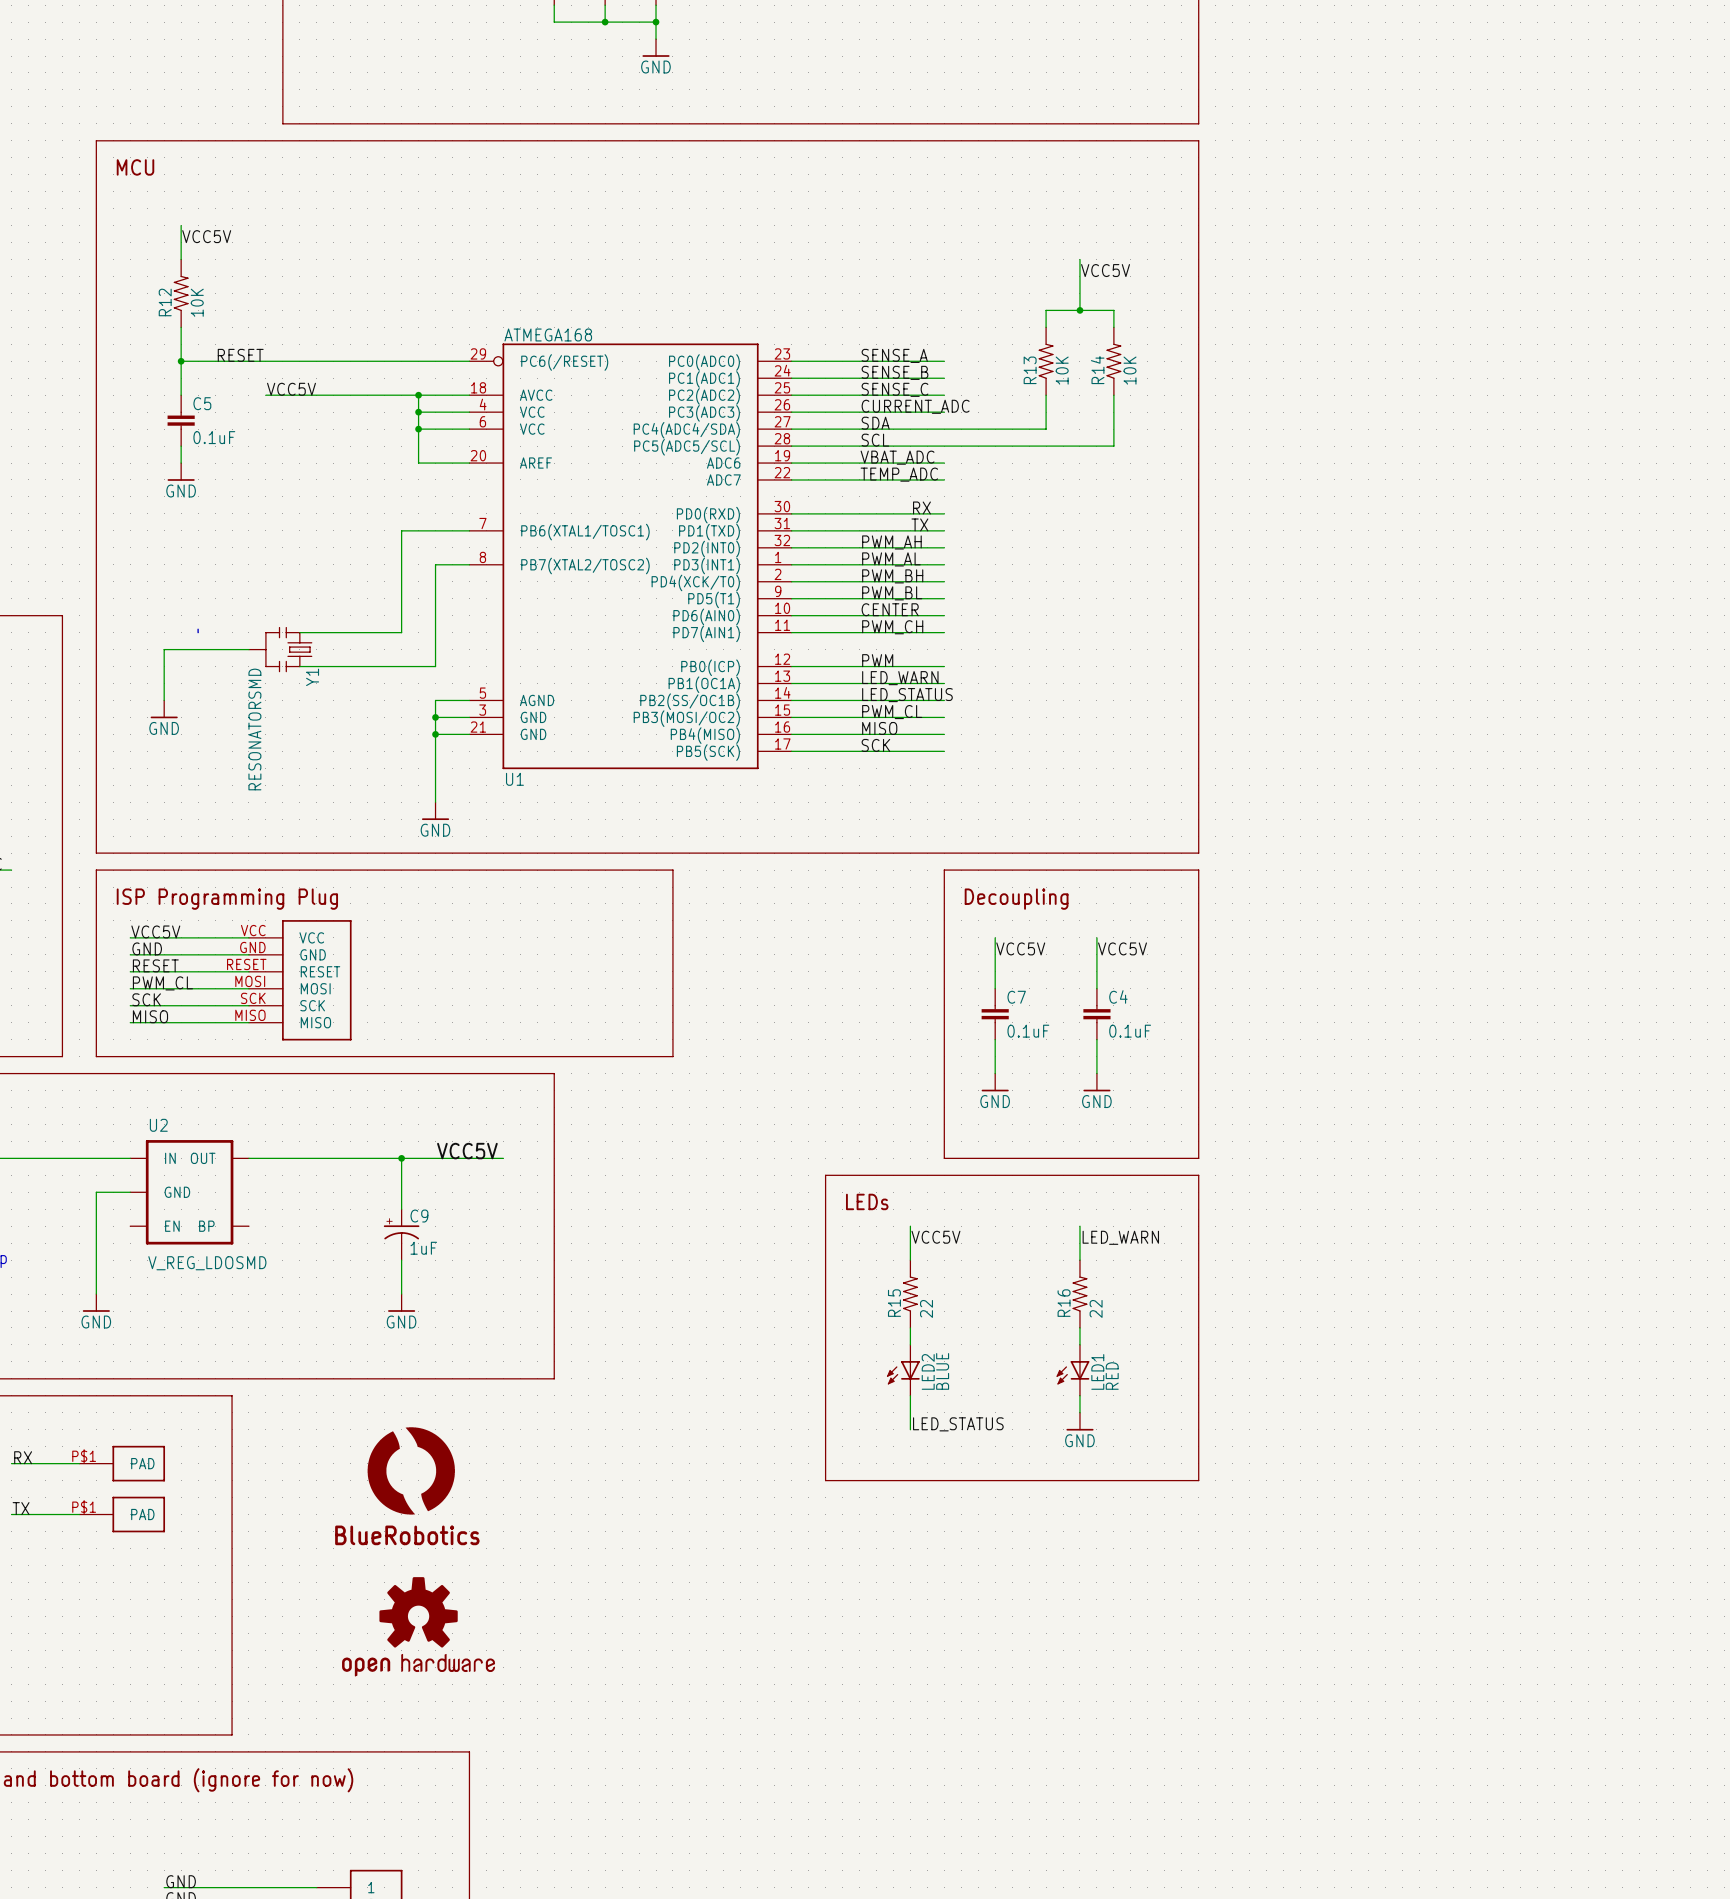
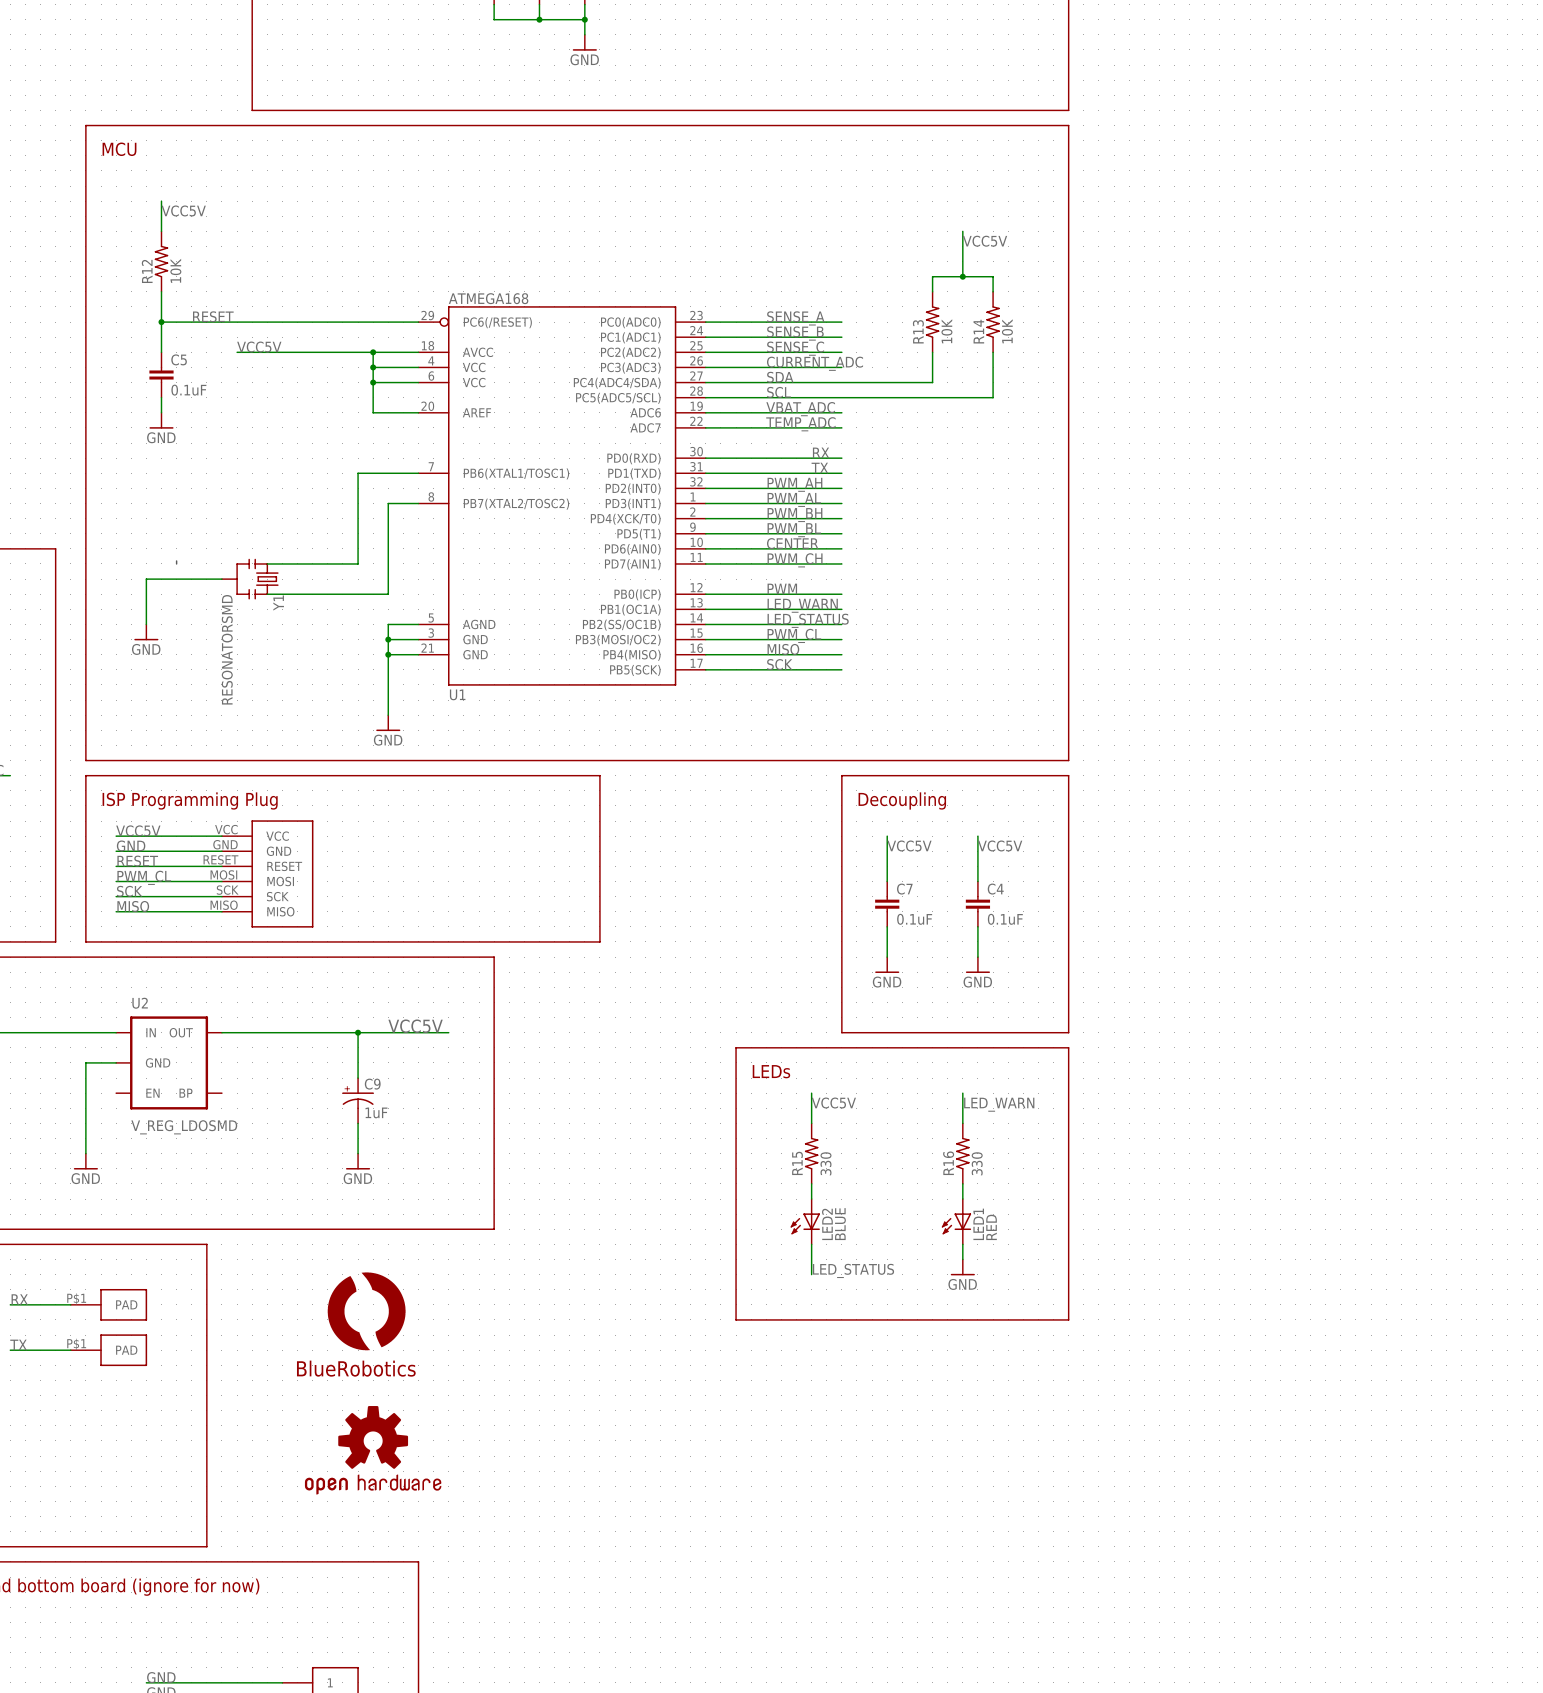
R15 value: 22 (926, 1308) -> 330 (826, 1163)
R16 value: 22 (1096, 1308) -> 330 (977, 1163)

